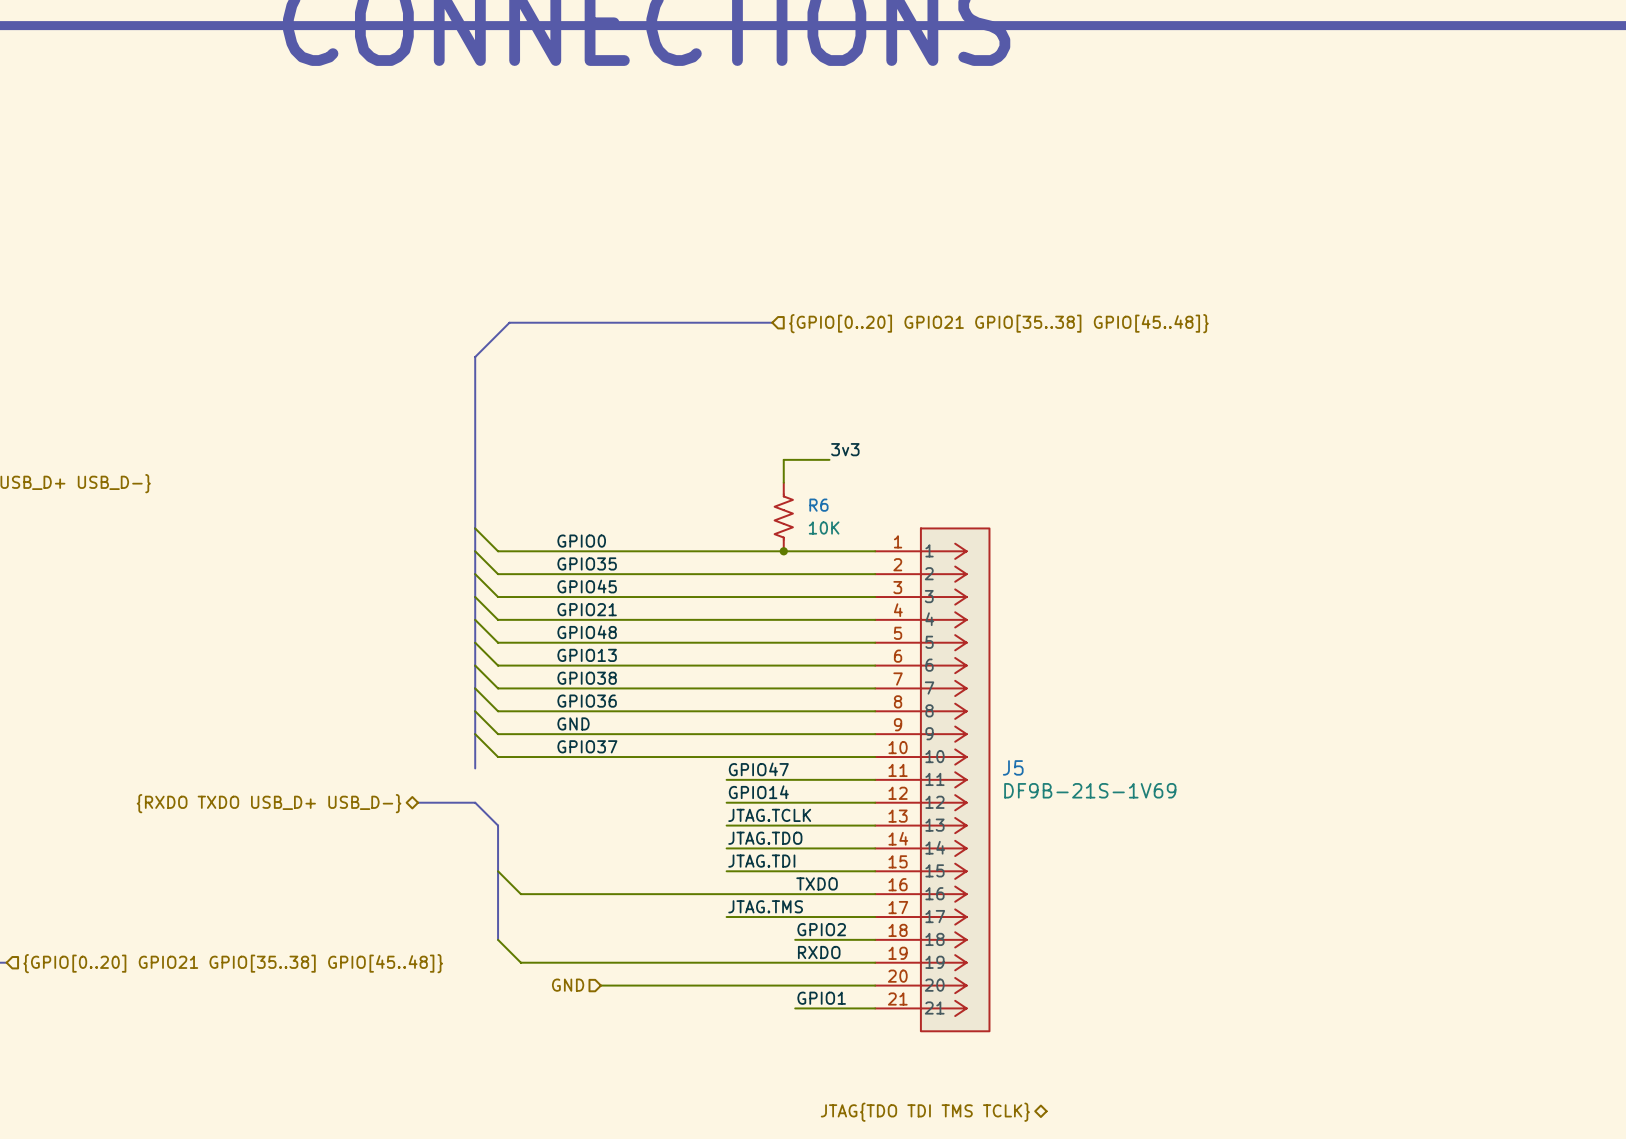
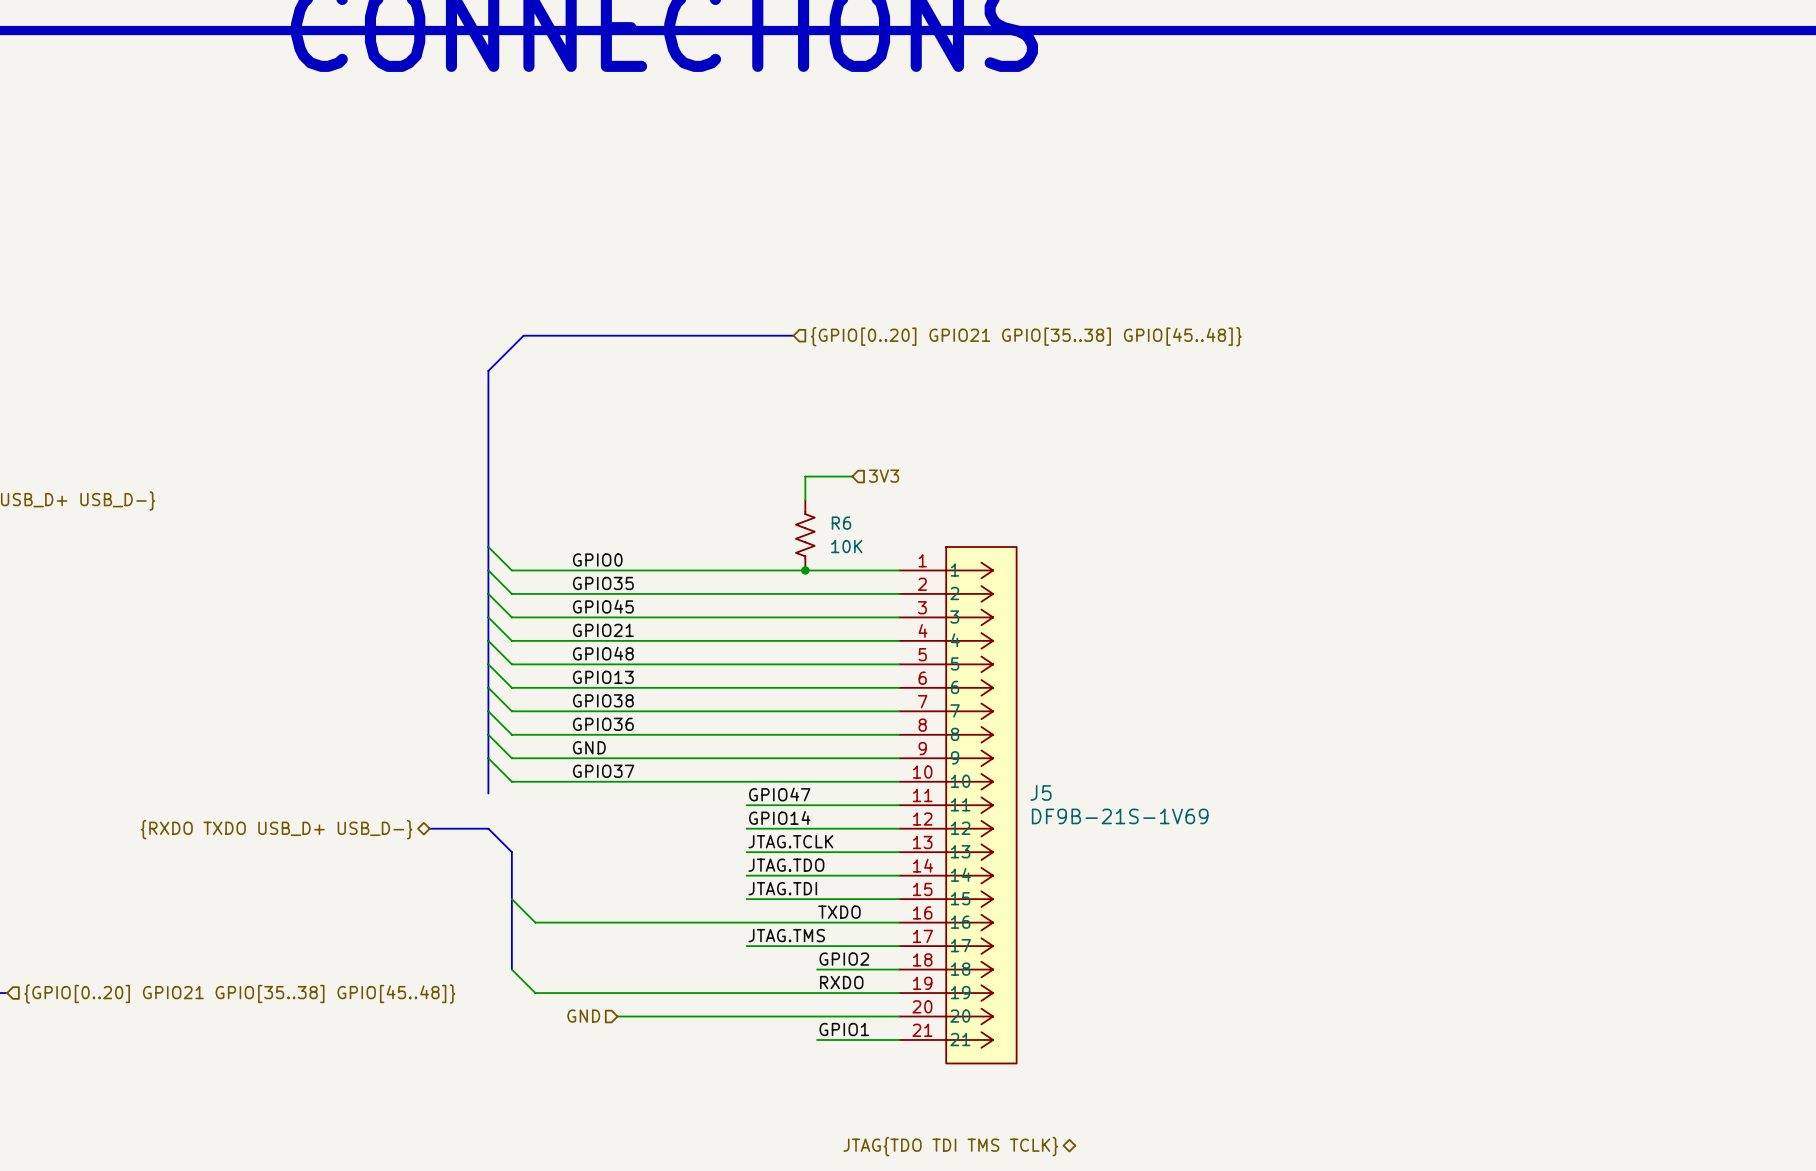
label: 3v3 (845, 449) -> none
hierarchical label: none -> 3V3 (884, 476)

